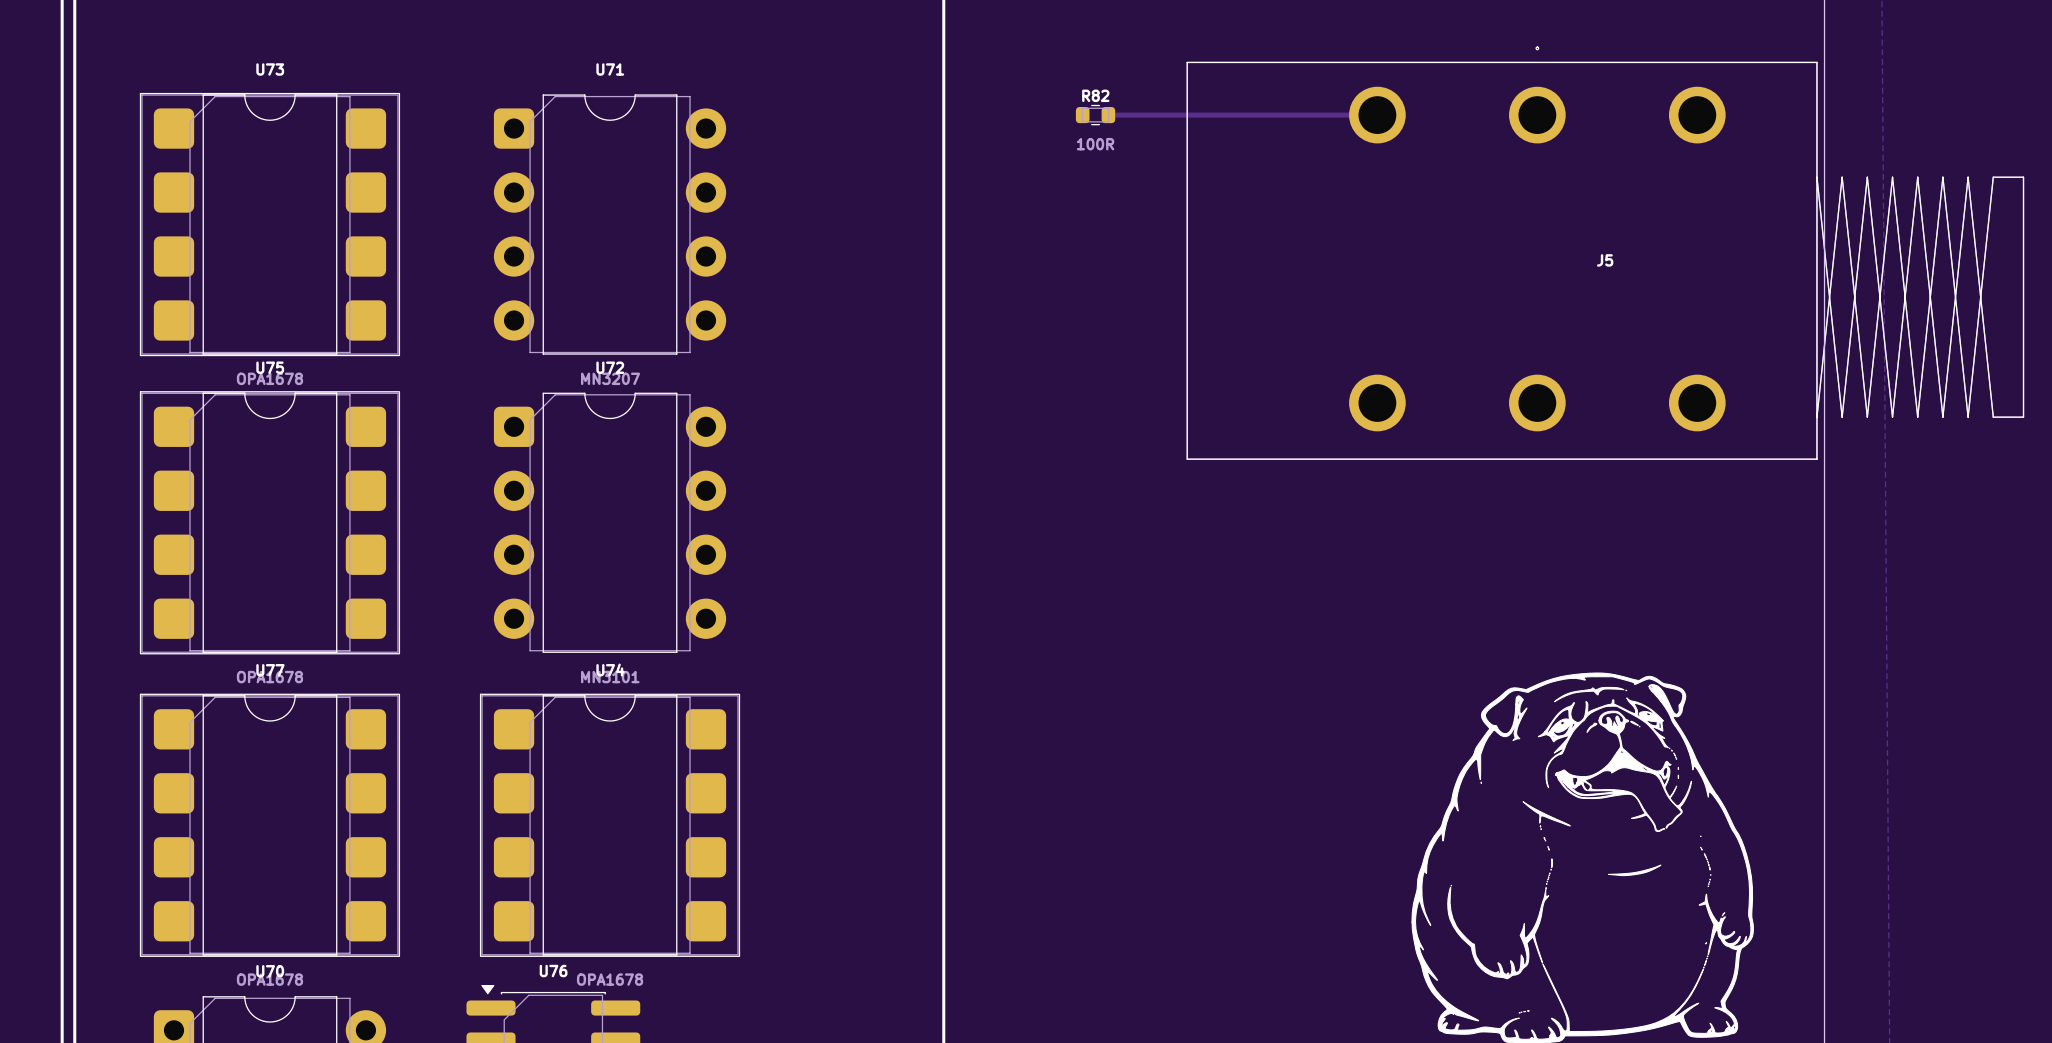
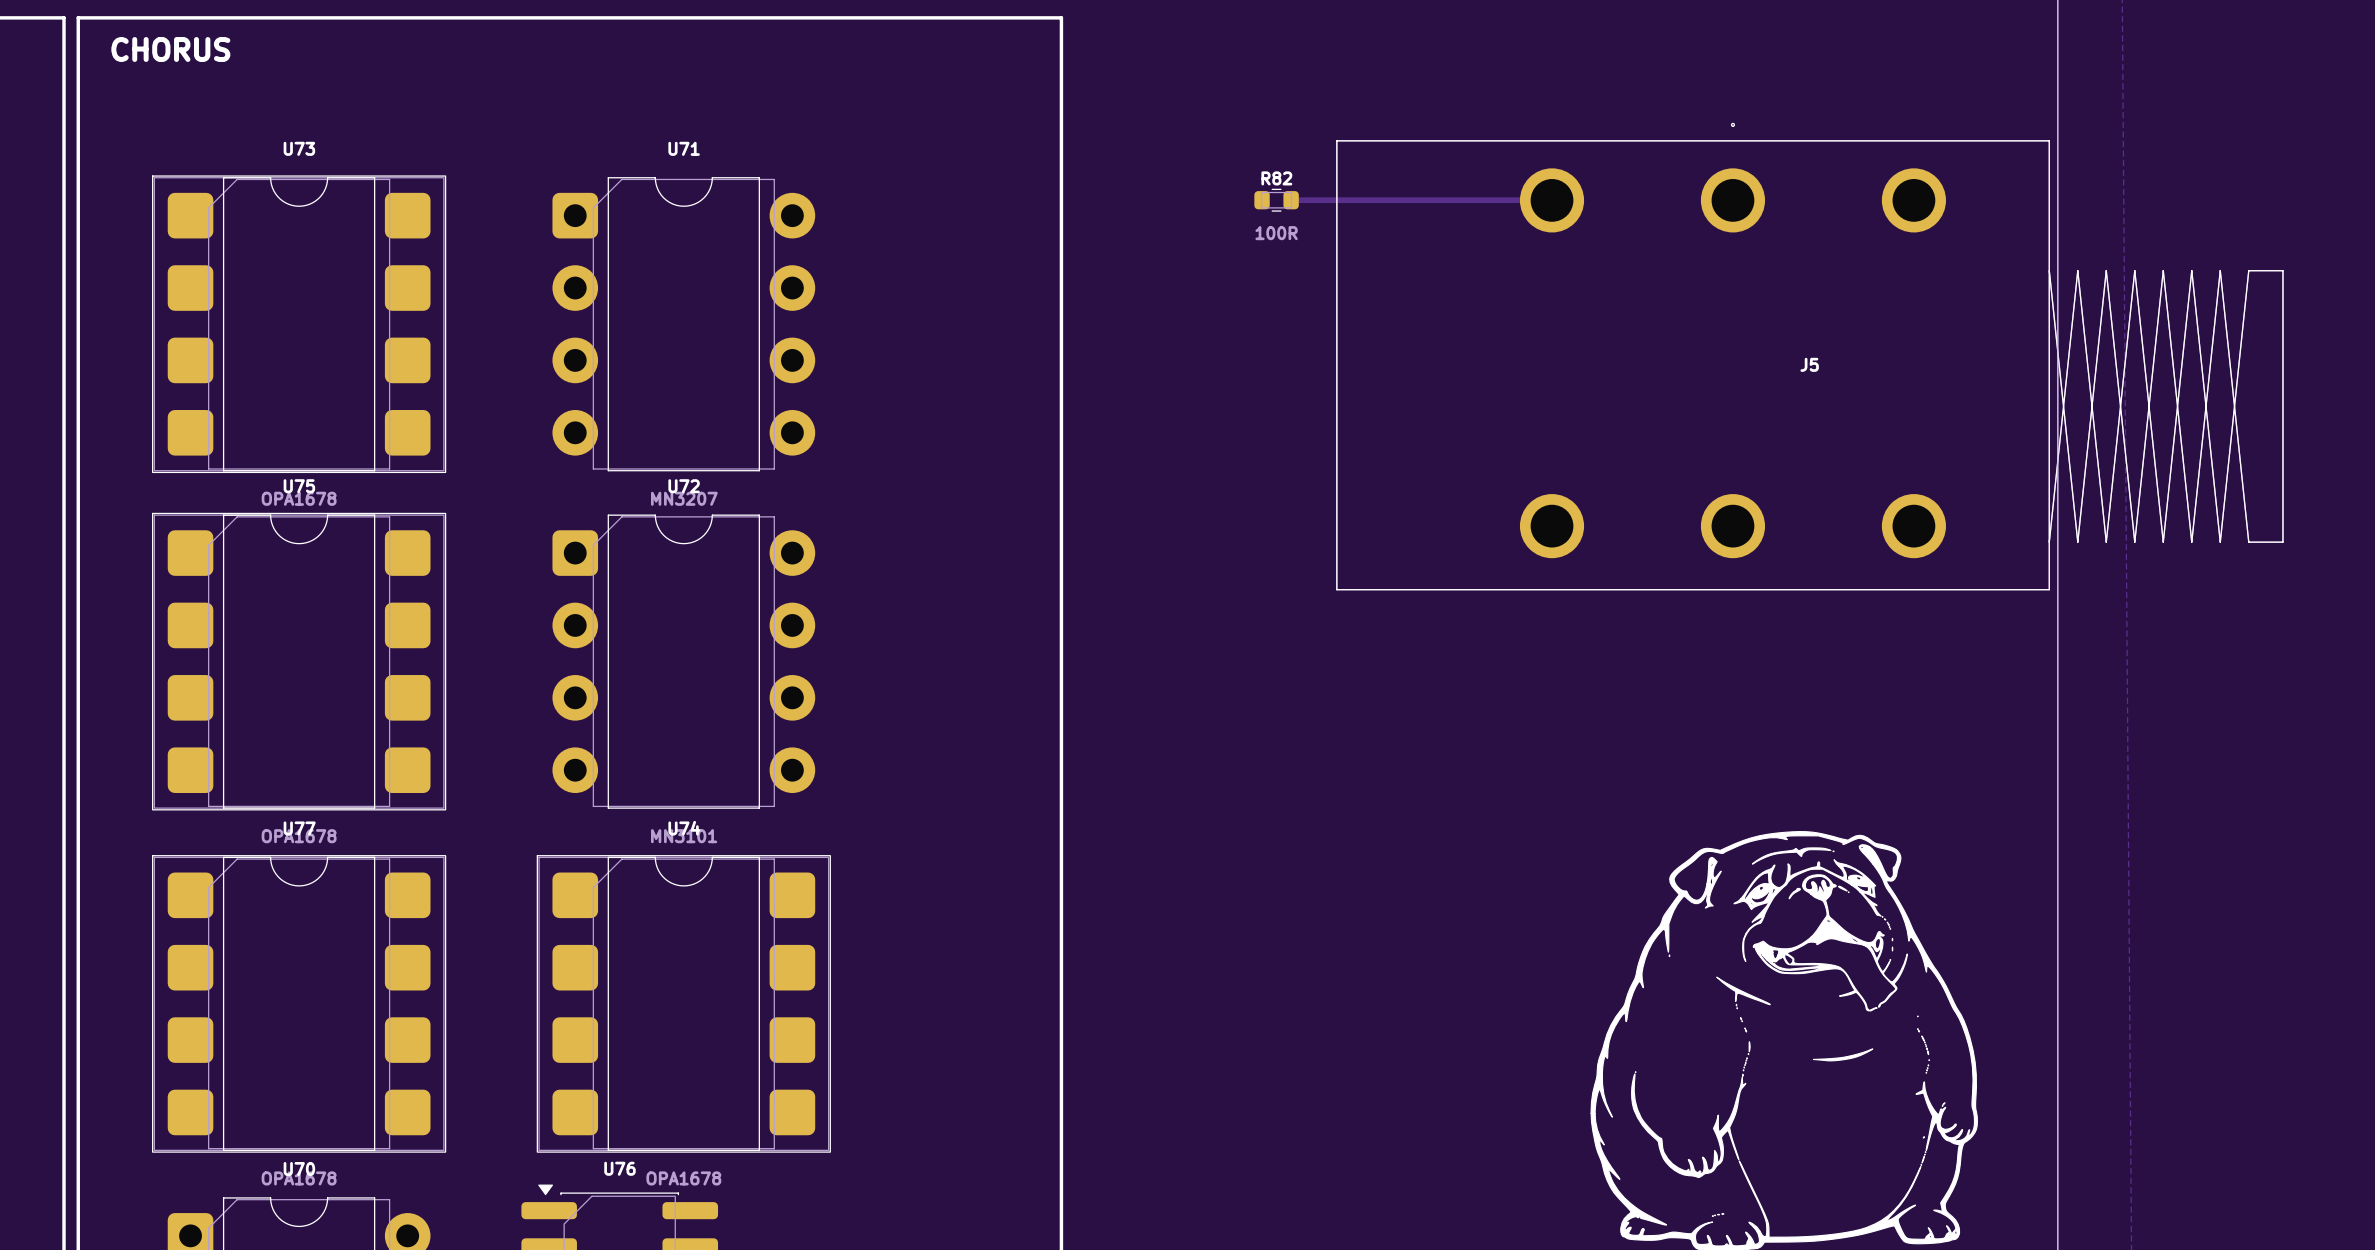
R82 position: (1095, 115) -> (1276, 200)
track: (1108, 115) (1377, 115) -> (1291, 200) (1551, 200)

